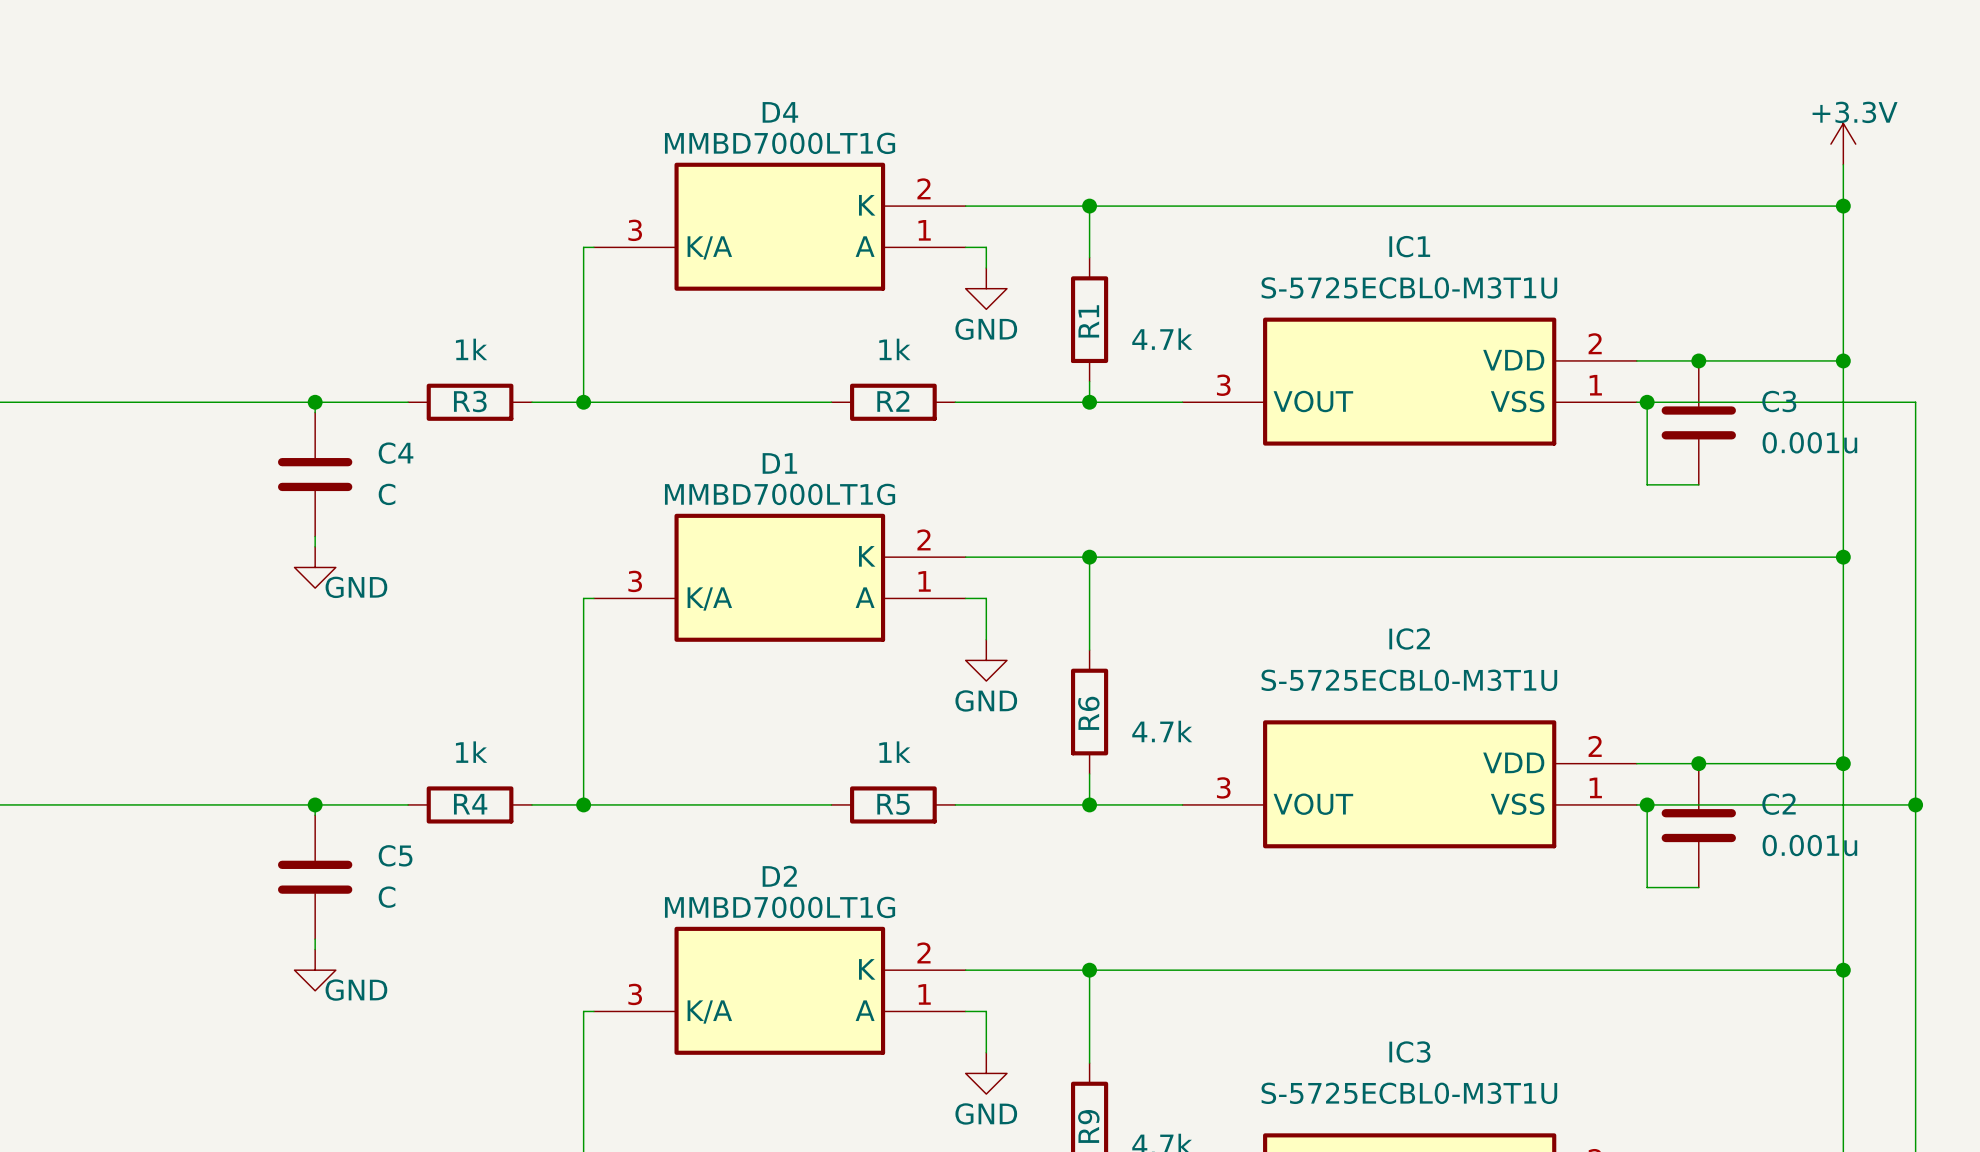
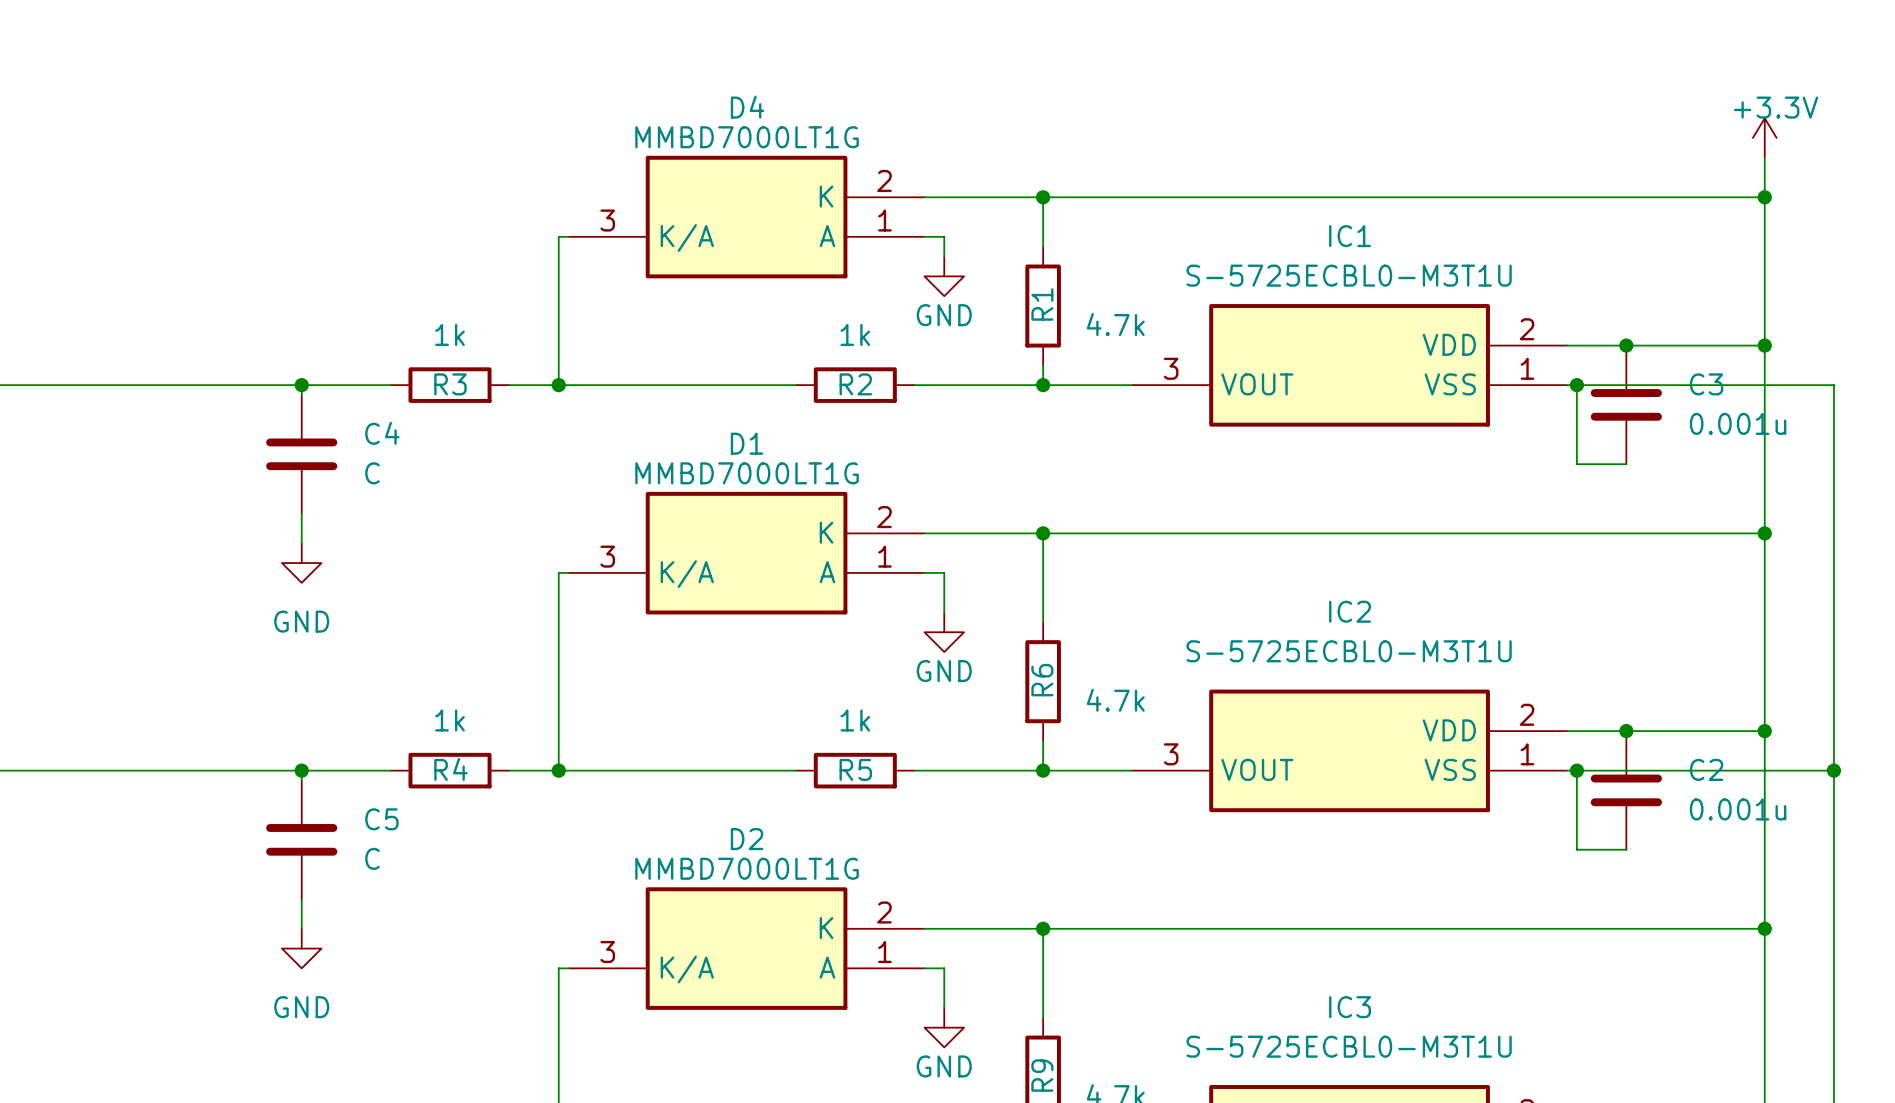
power symbol position: GND (315, 567) -> GND (301, 563)
power symbol text position: GND (356, 587) -> GND (301, 621)
power symbol position: GND (315, 970) -> GND (301, 948)
power symbol text position: GND (356, 990) -> GND (301, 1007)

